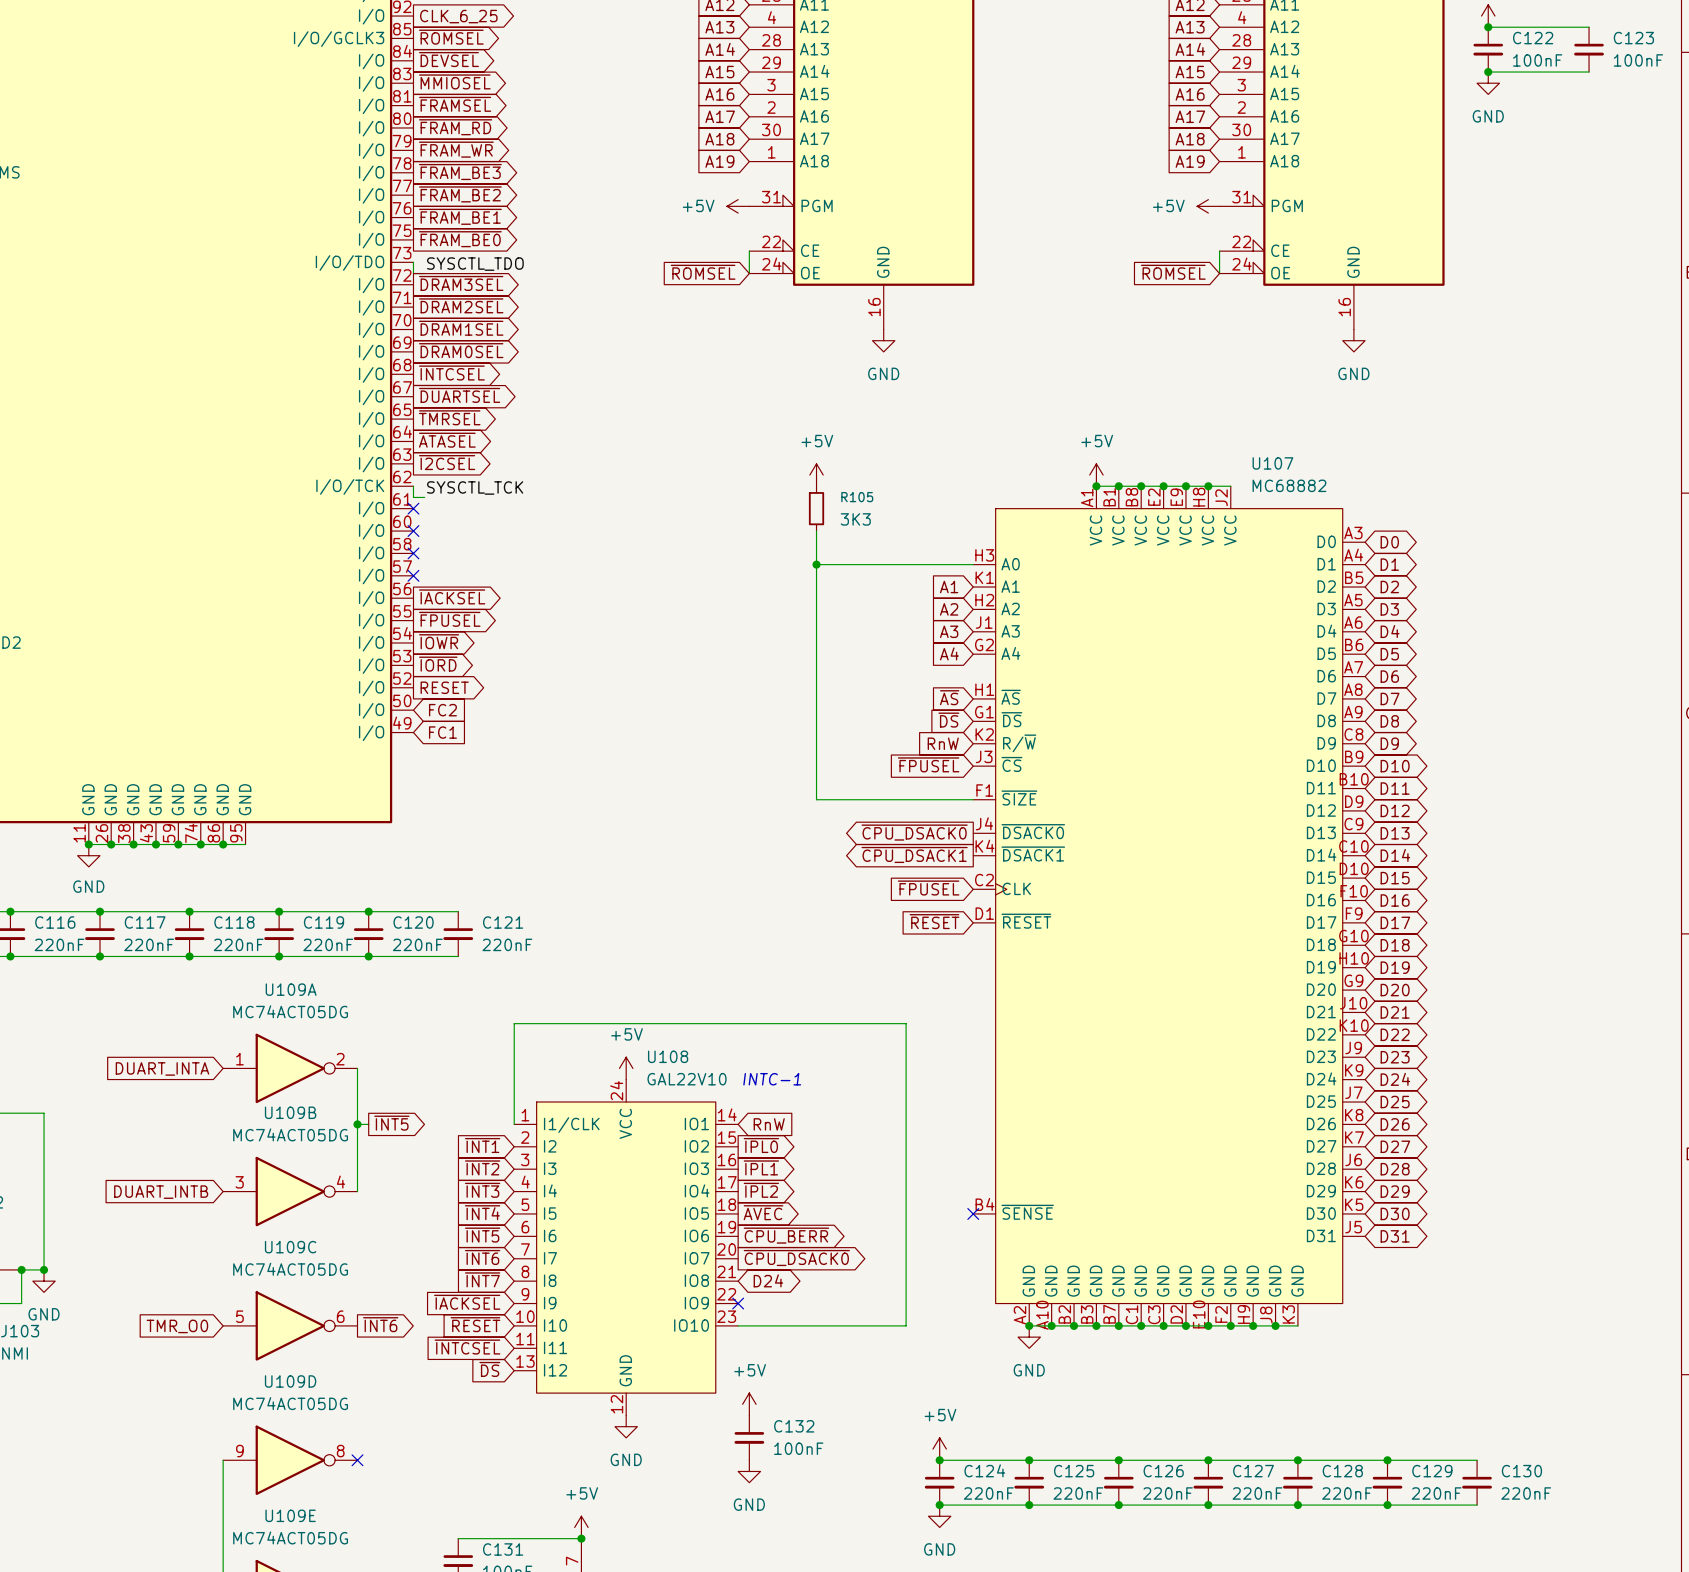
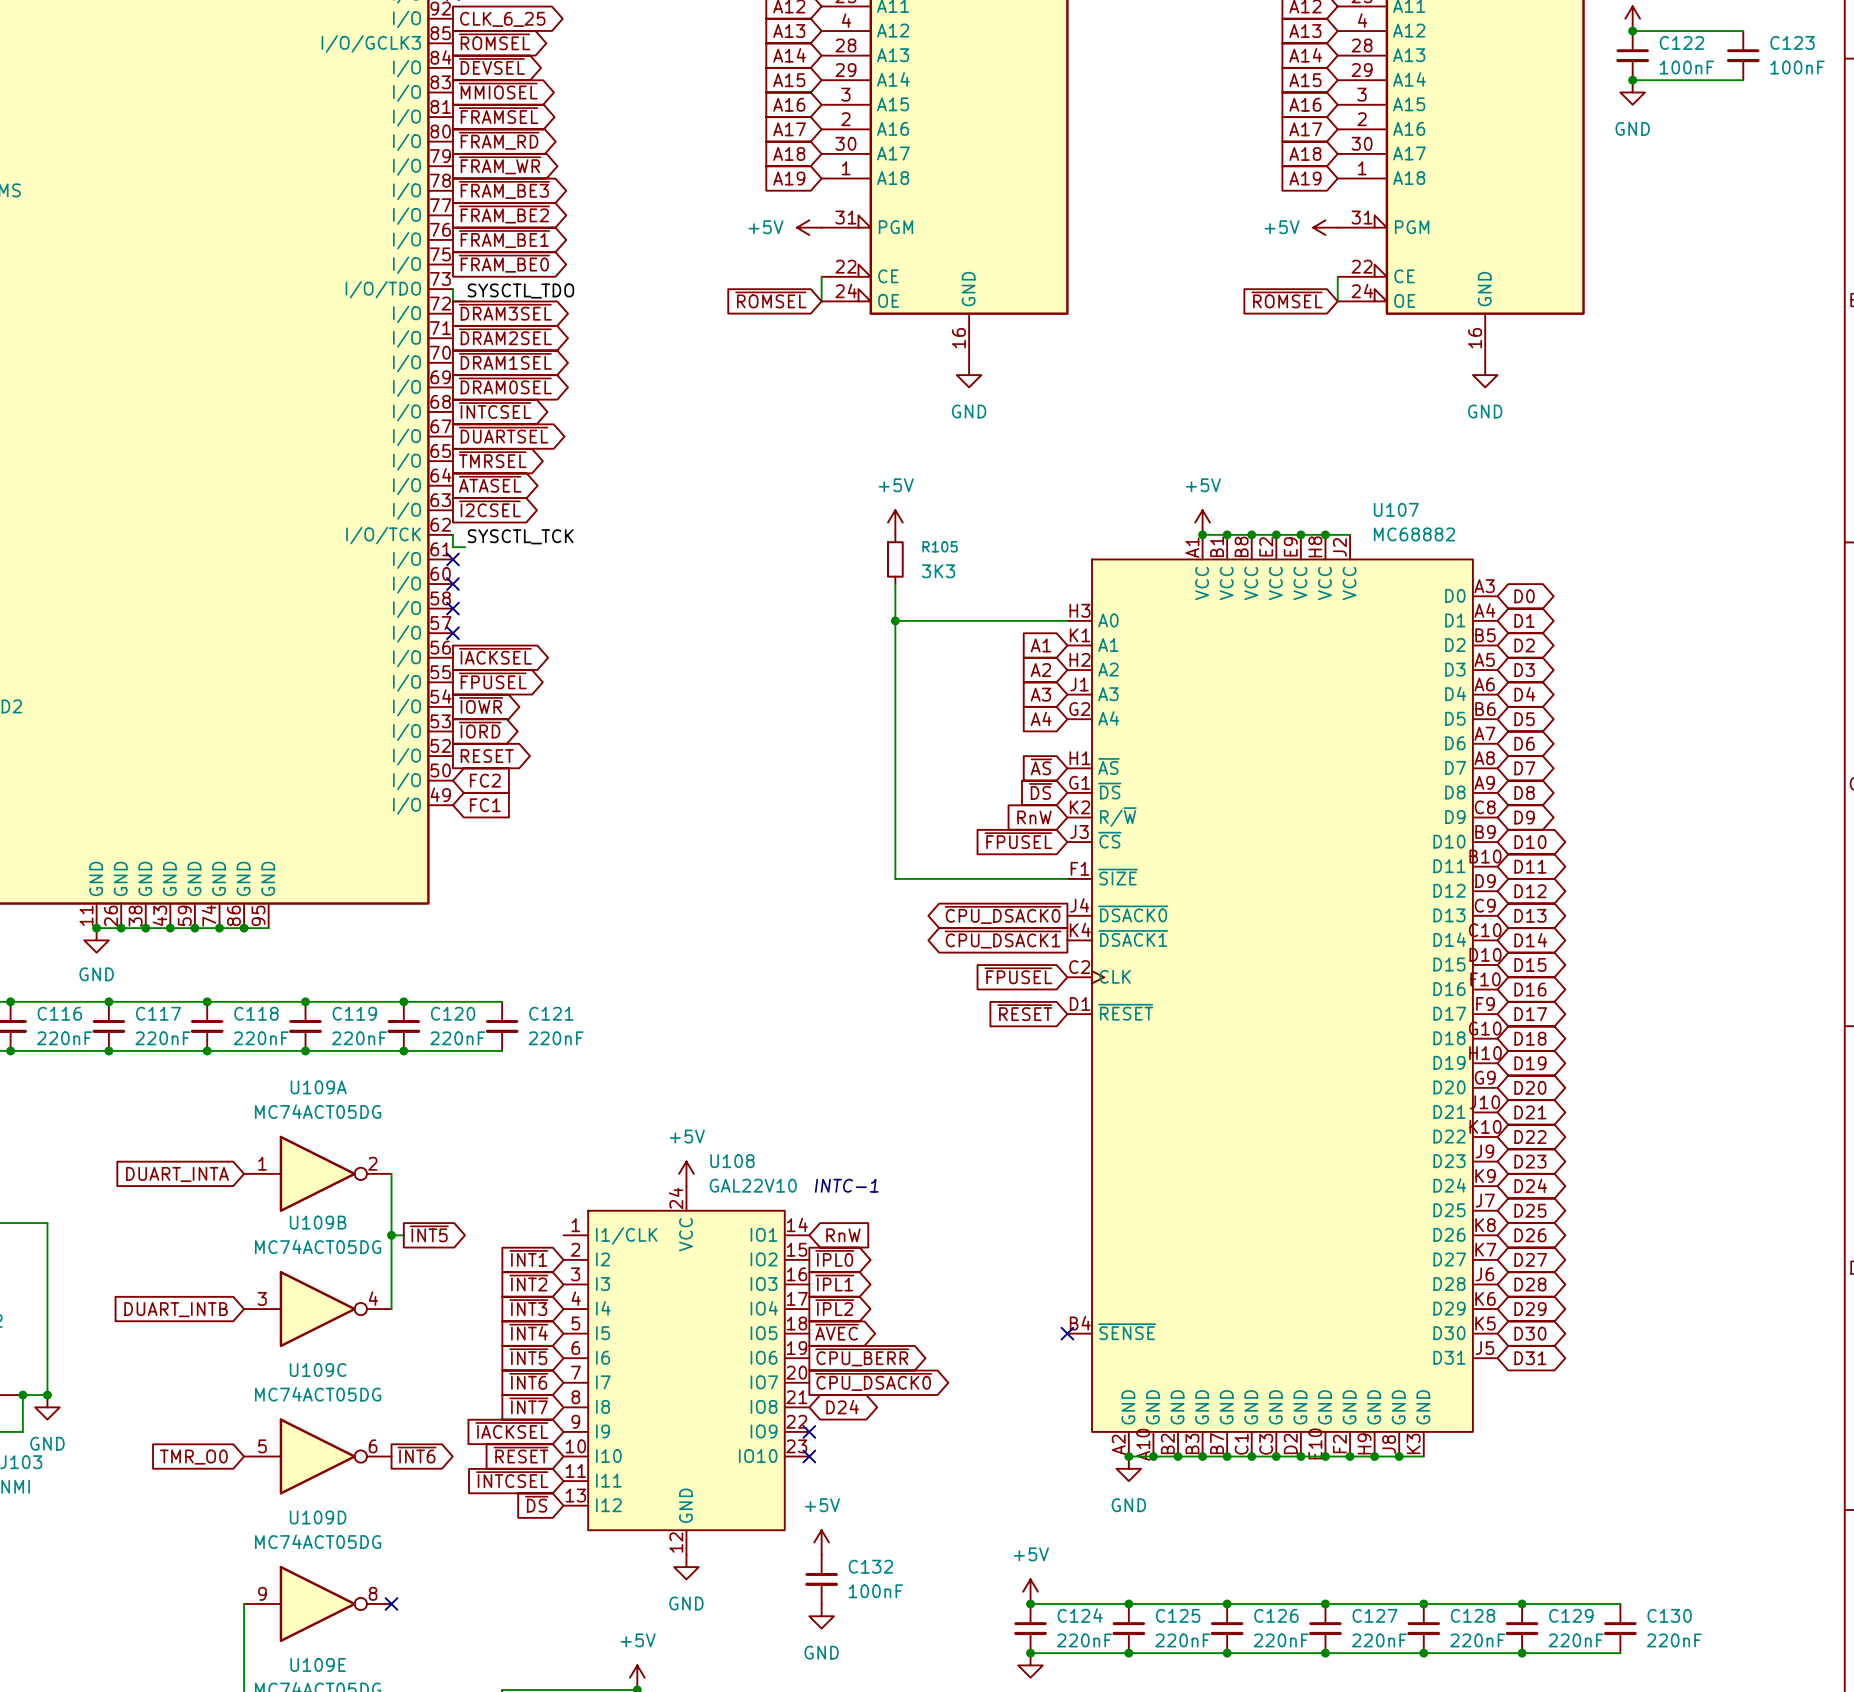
wire: (514, 1124) (514, 1023) (906, 1023) (906, 1325) (738, 1325) -> none
no-connect mark: none -> (809, 1456)

